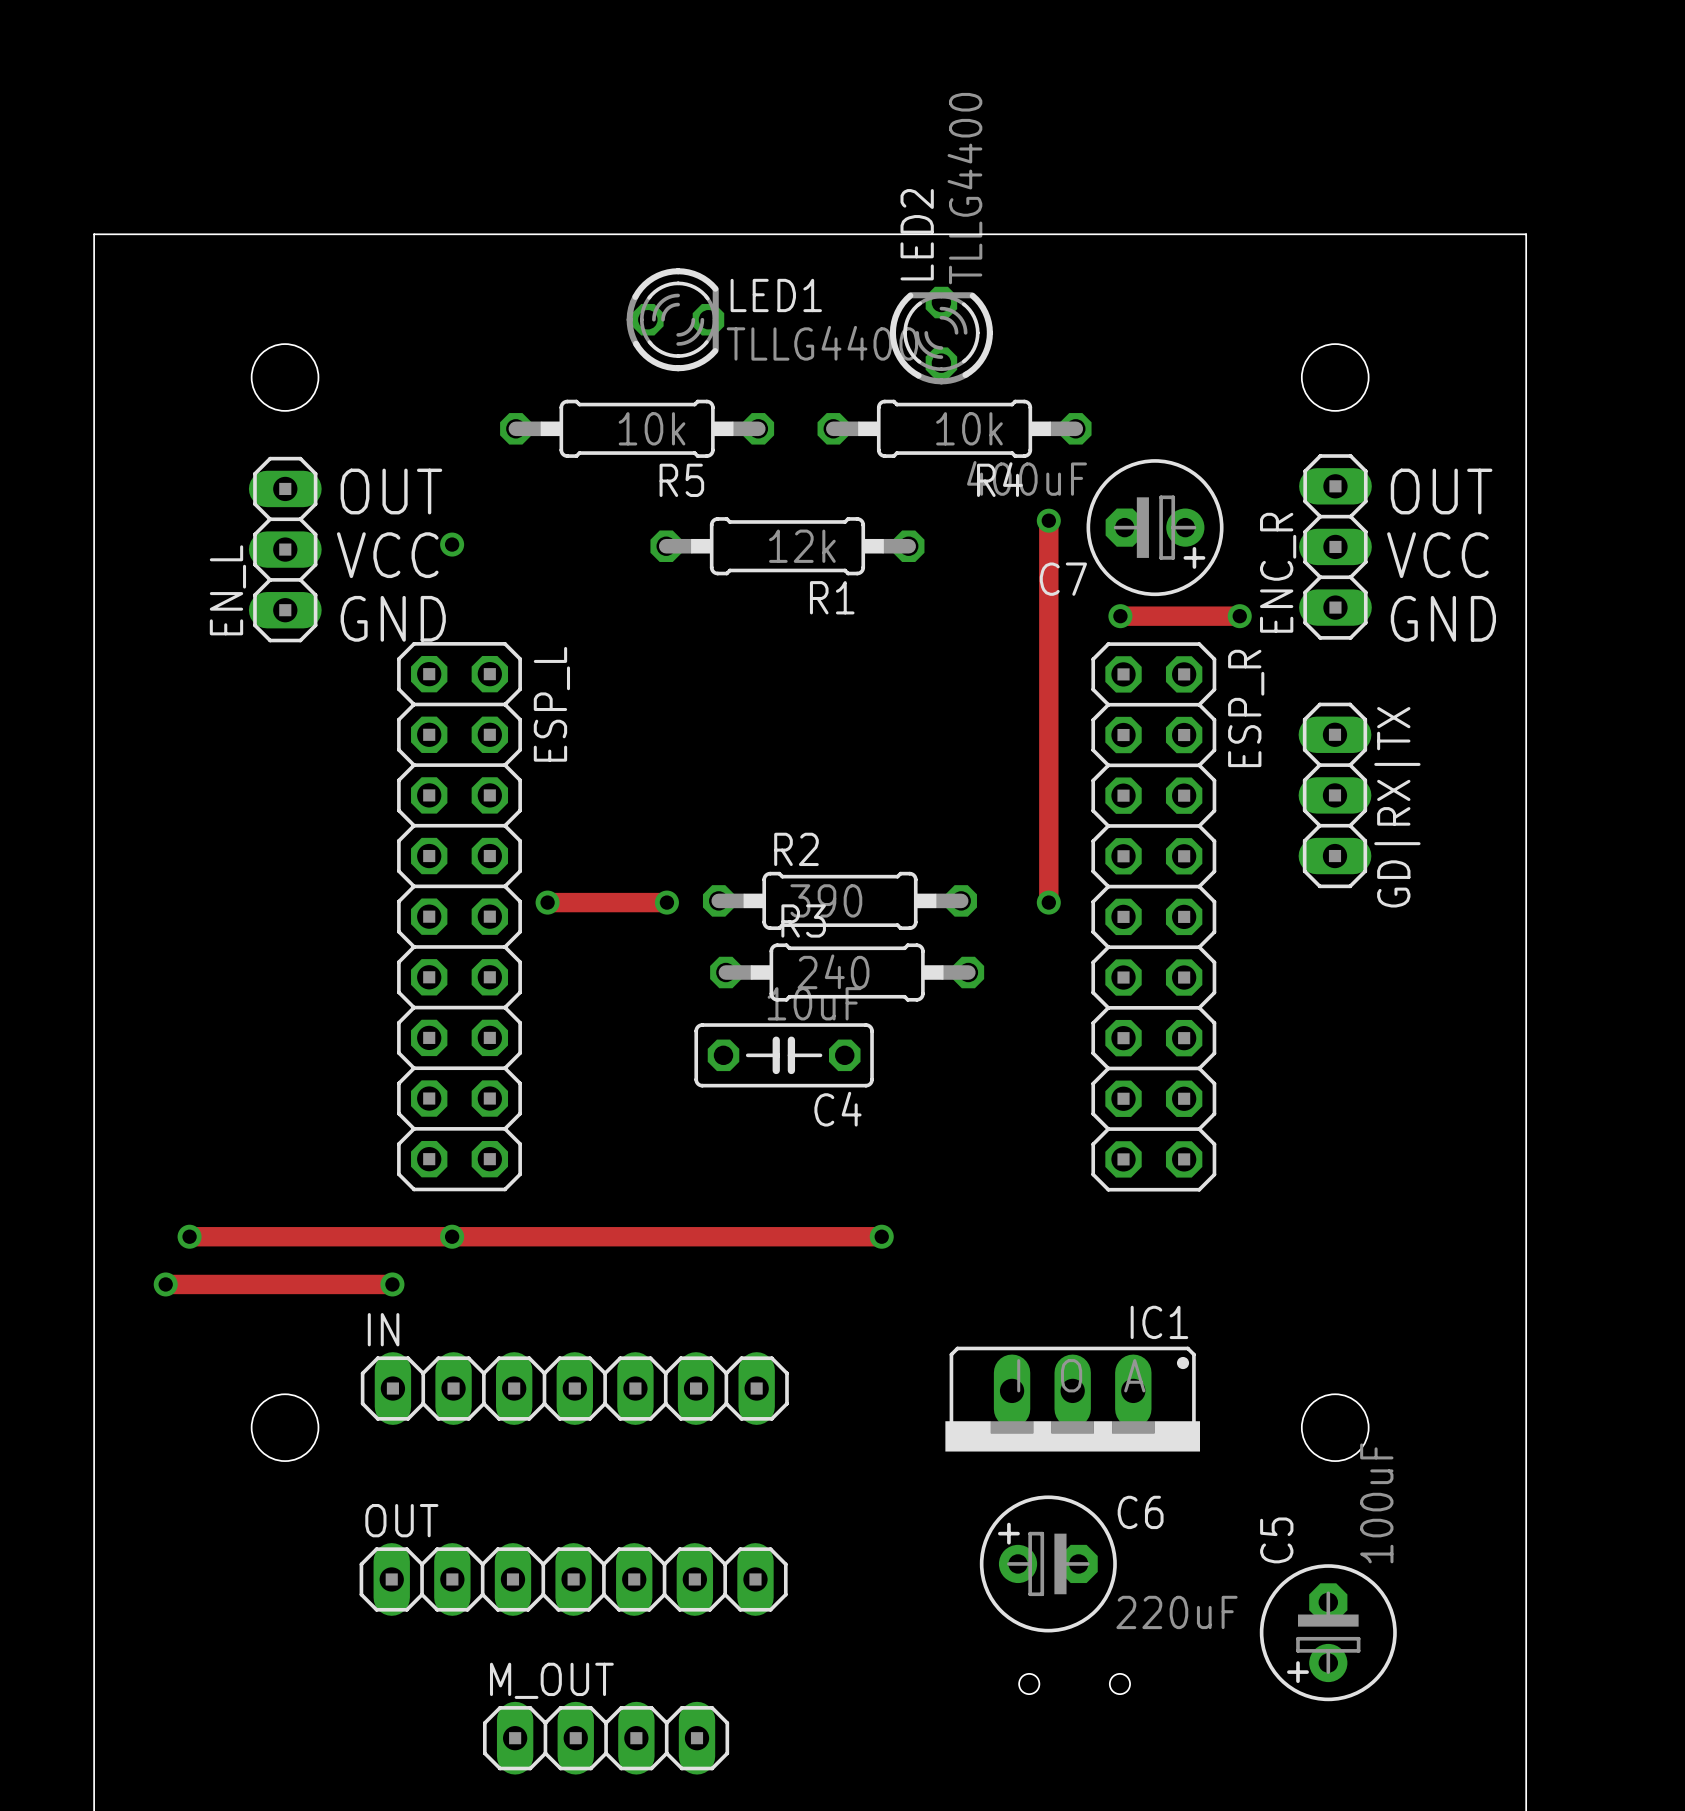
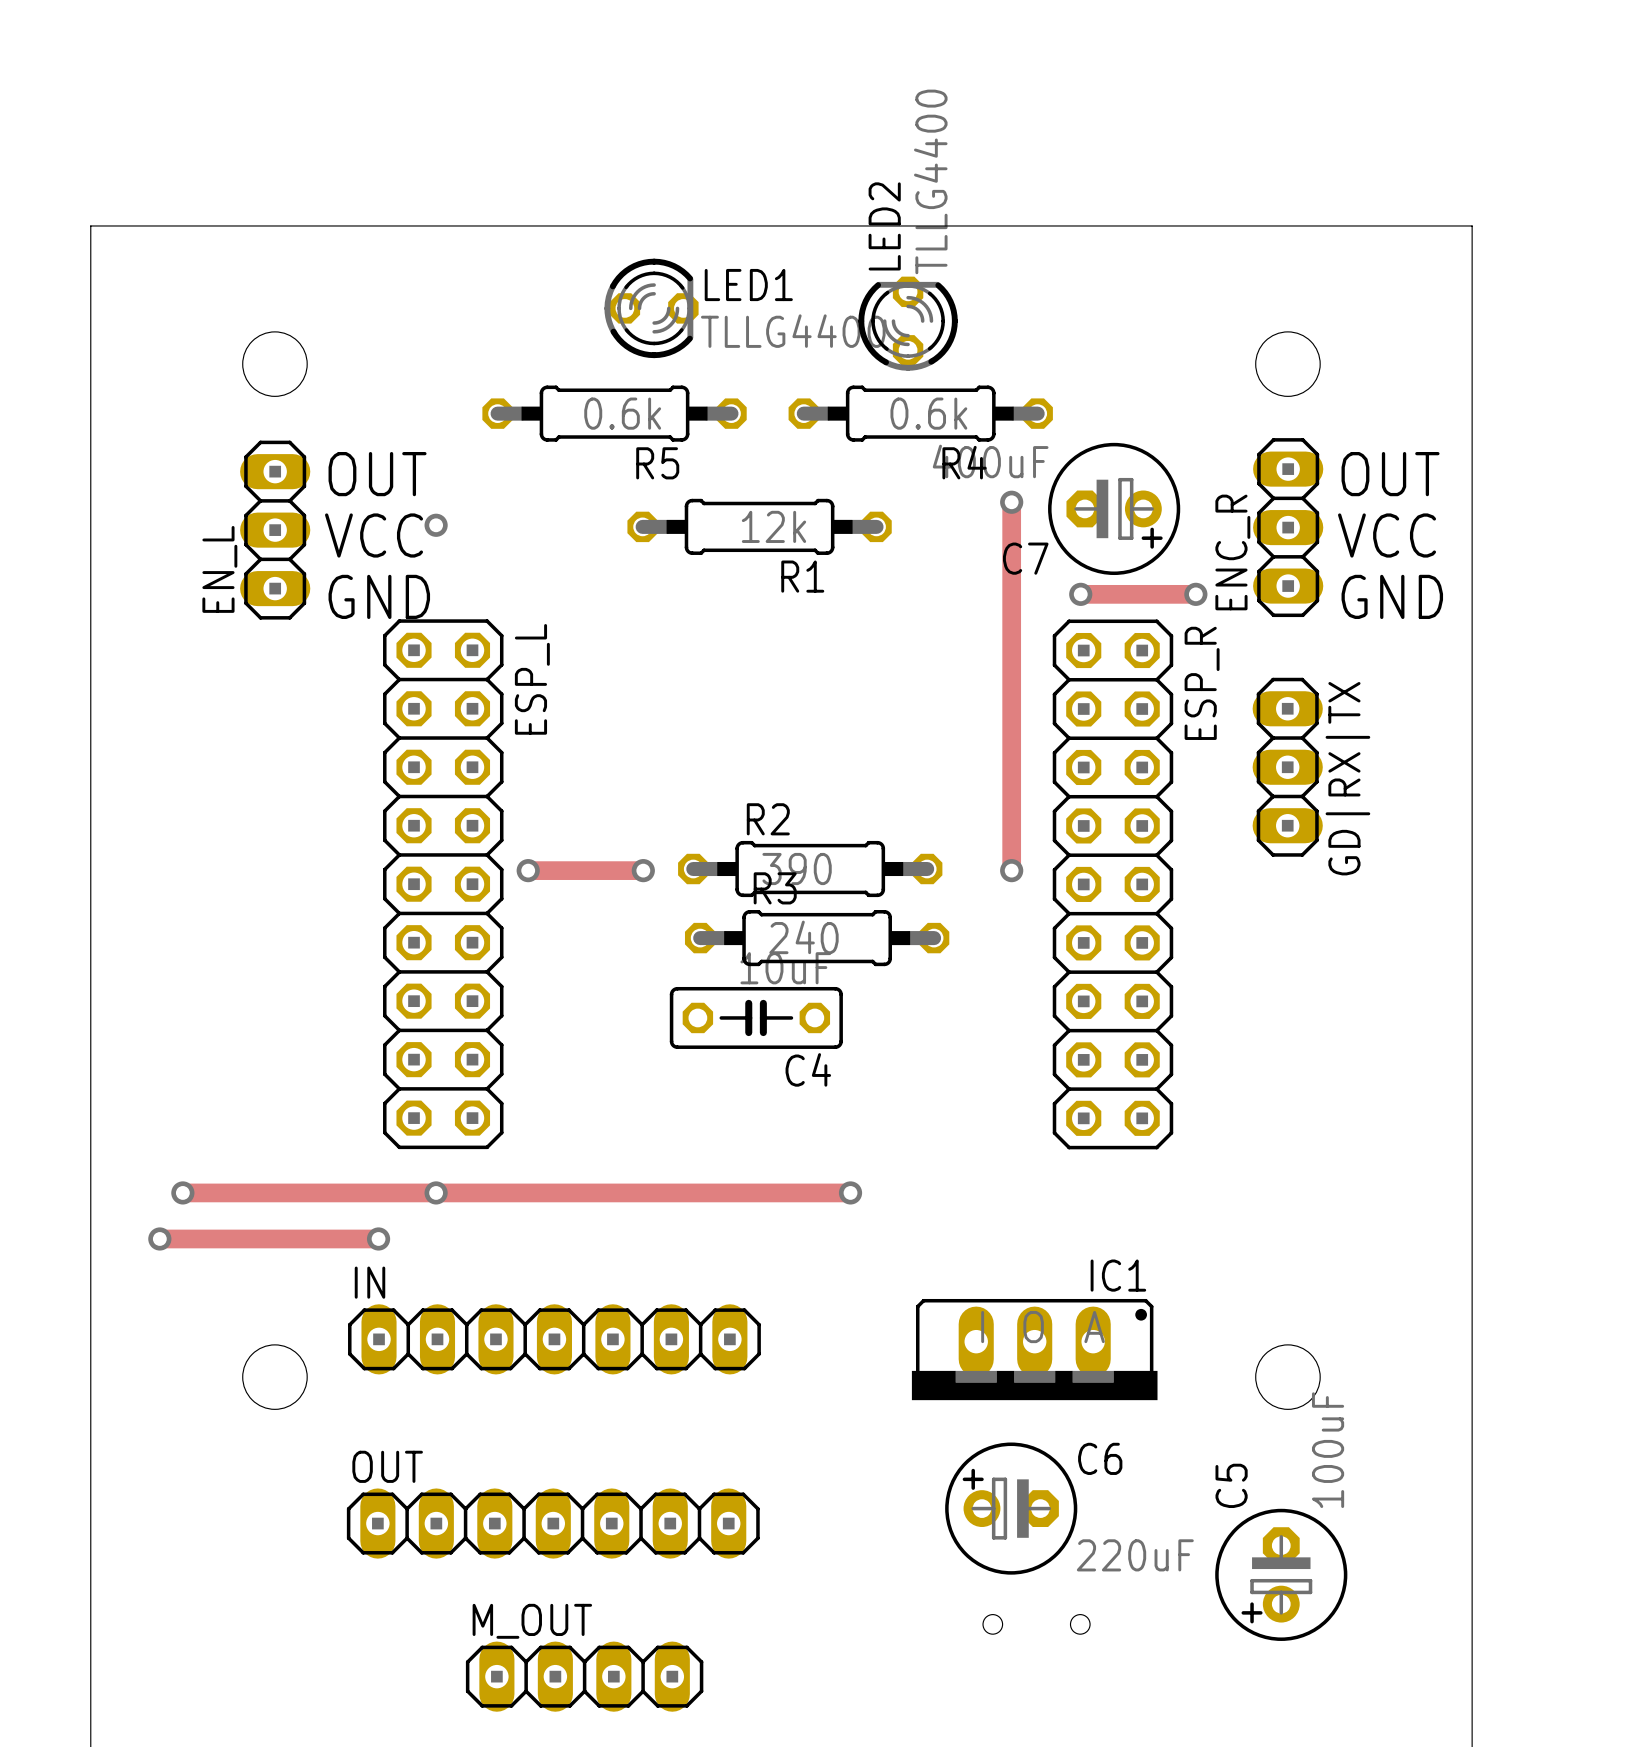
R5 value: 10k (652, 428) -> 0.6k (622, 413)
R4 value: 10k (969, 428) -> 0.6k (928, 413)

